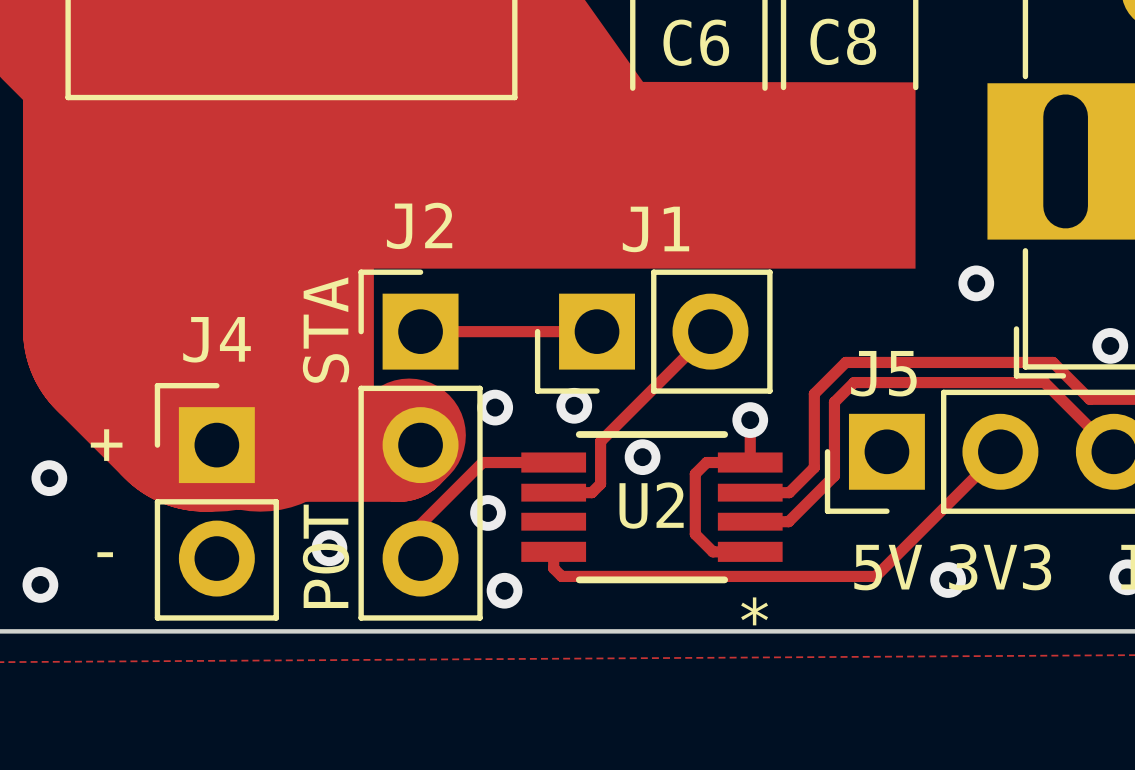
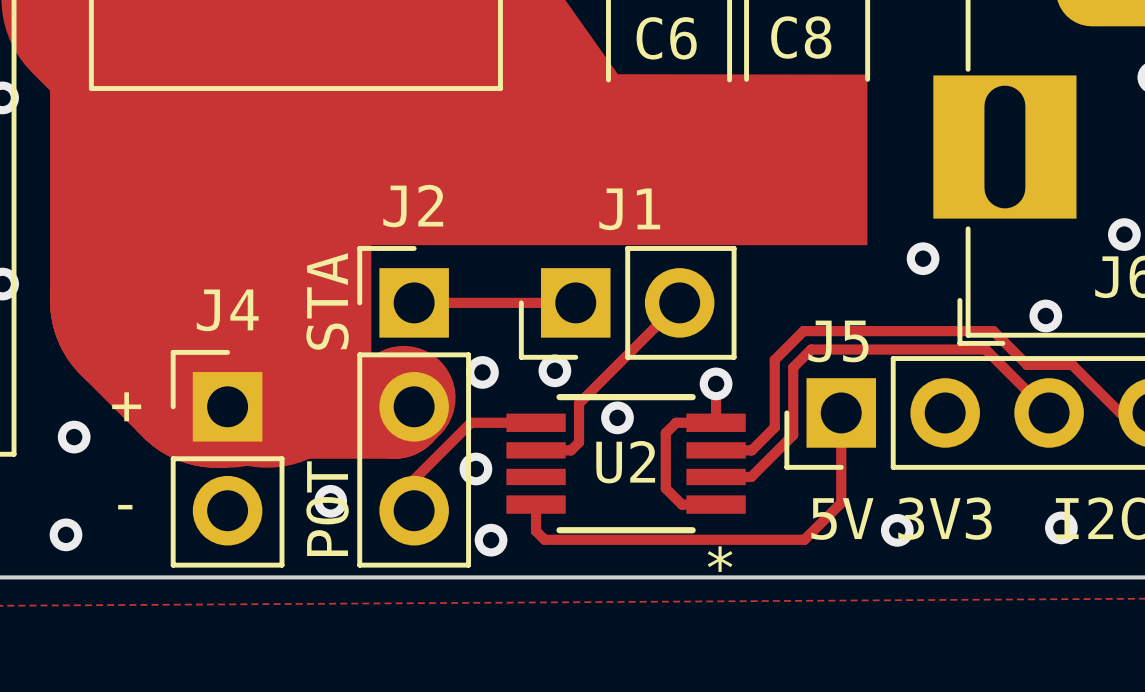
track: (1000, 451) (875, 576) (561, 576) (553, 568) -> (841, 412) (841, 502) (804, 539) (544, 539) (536, 531) (536, 519)

